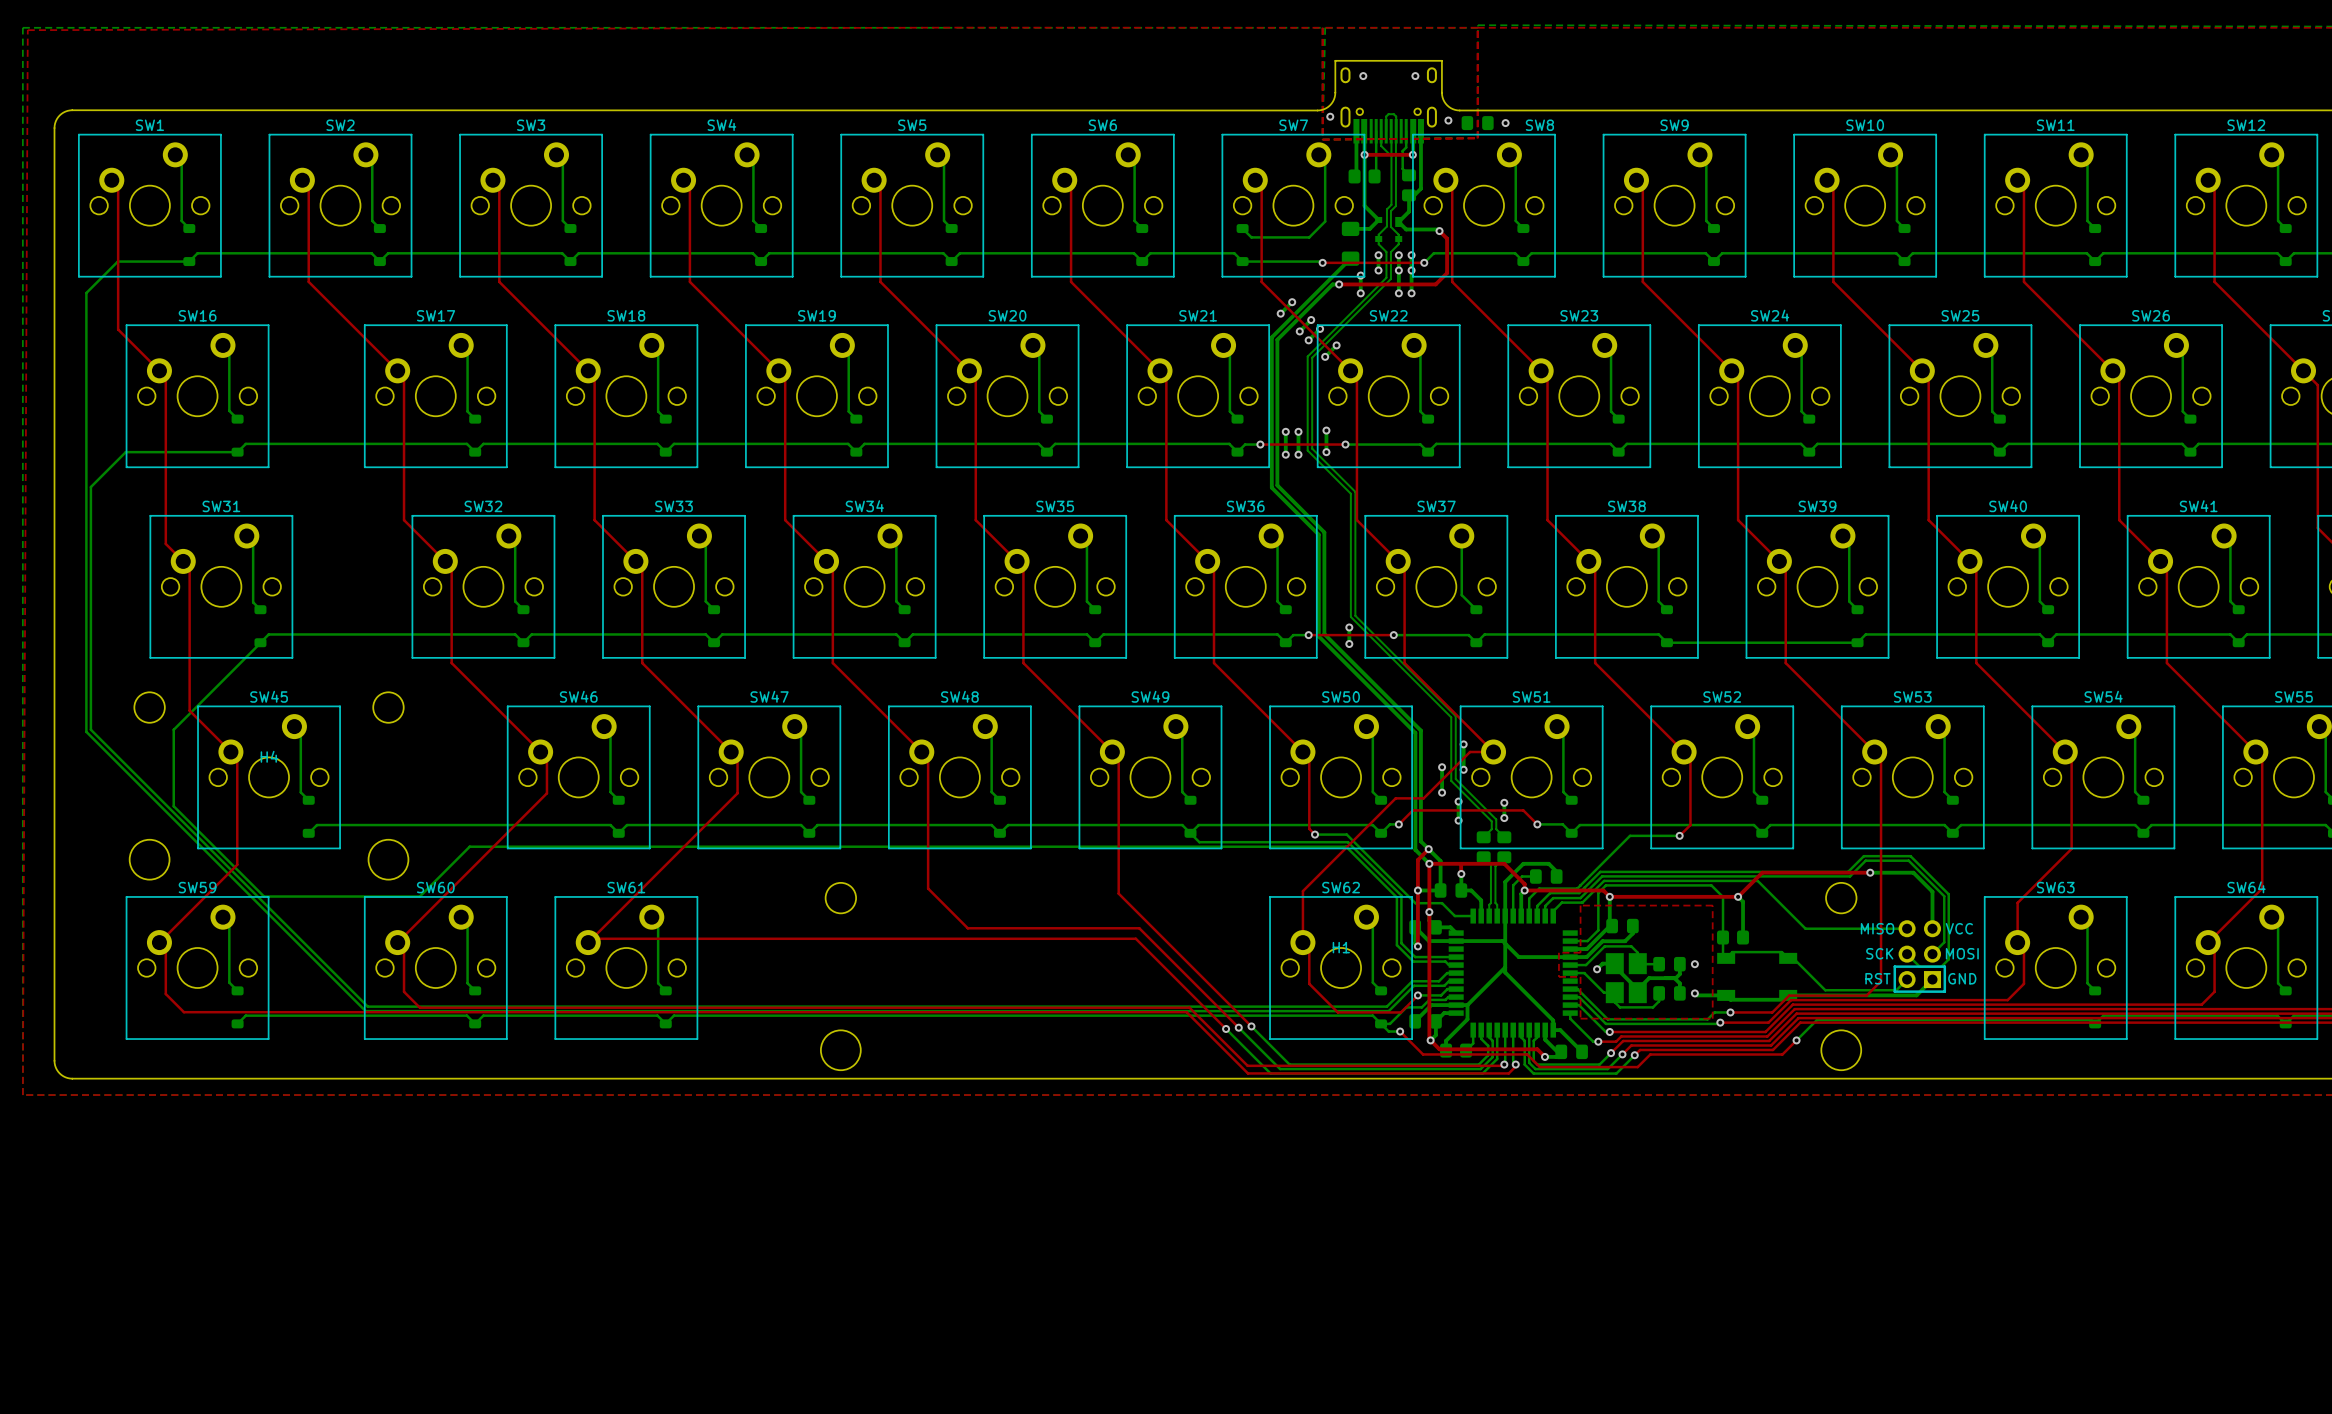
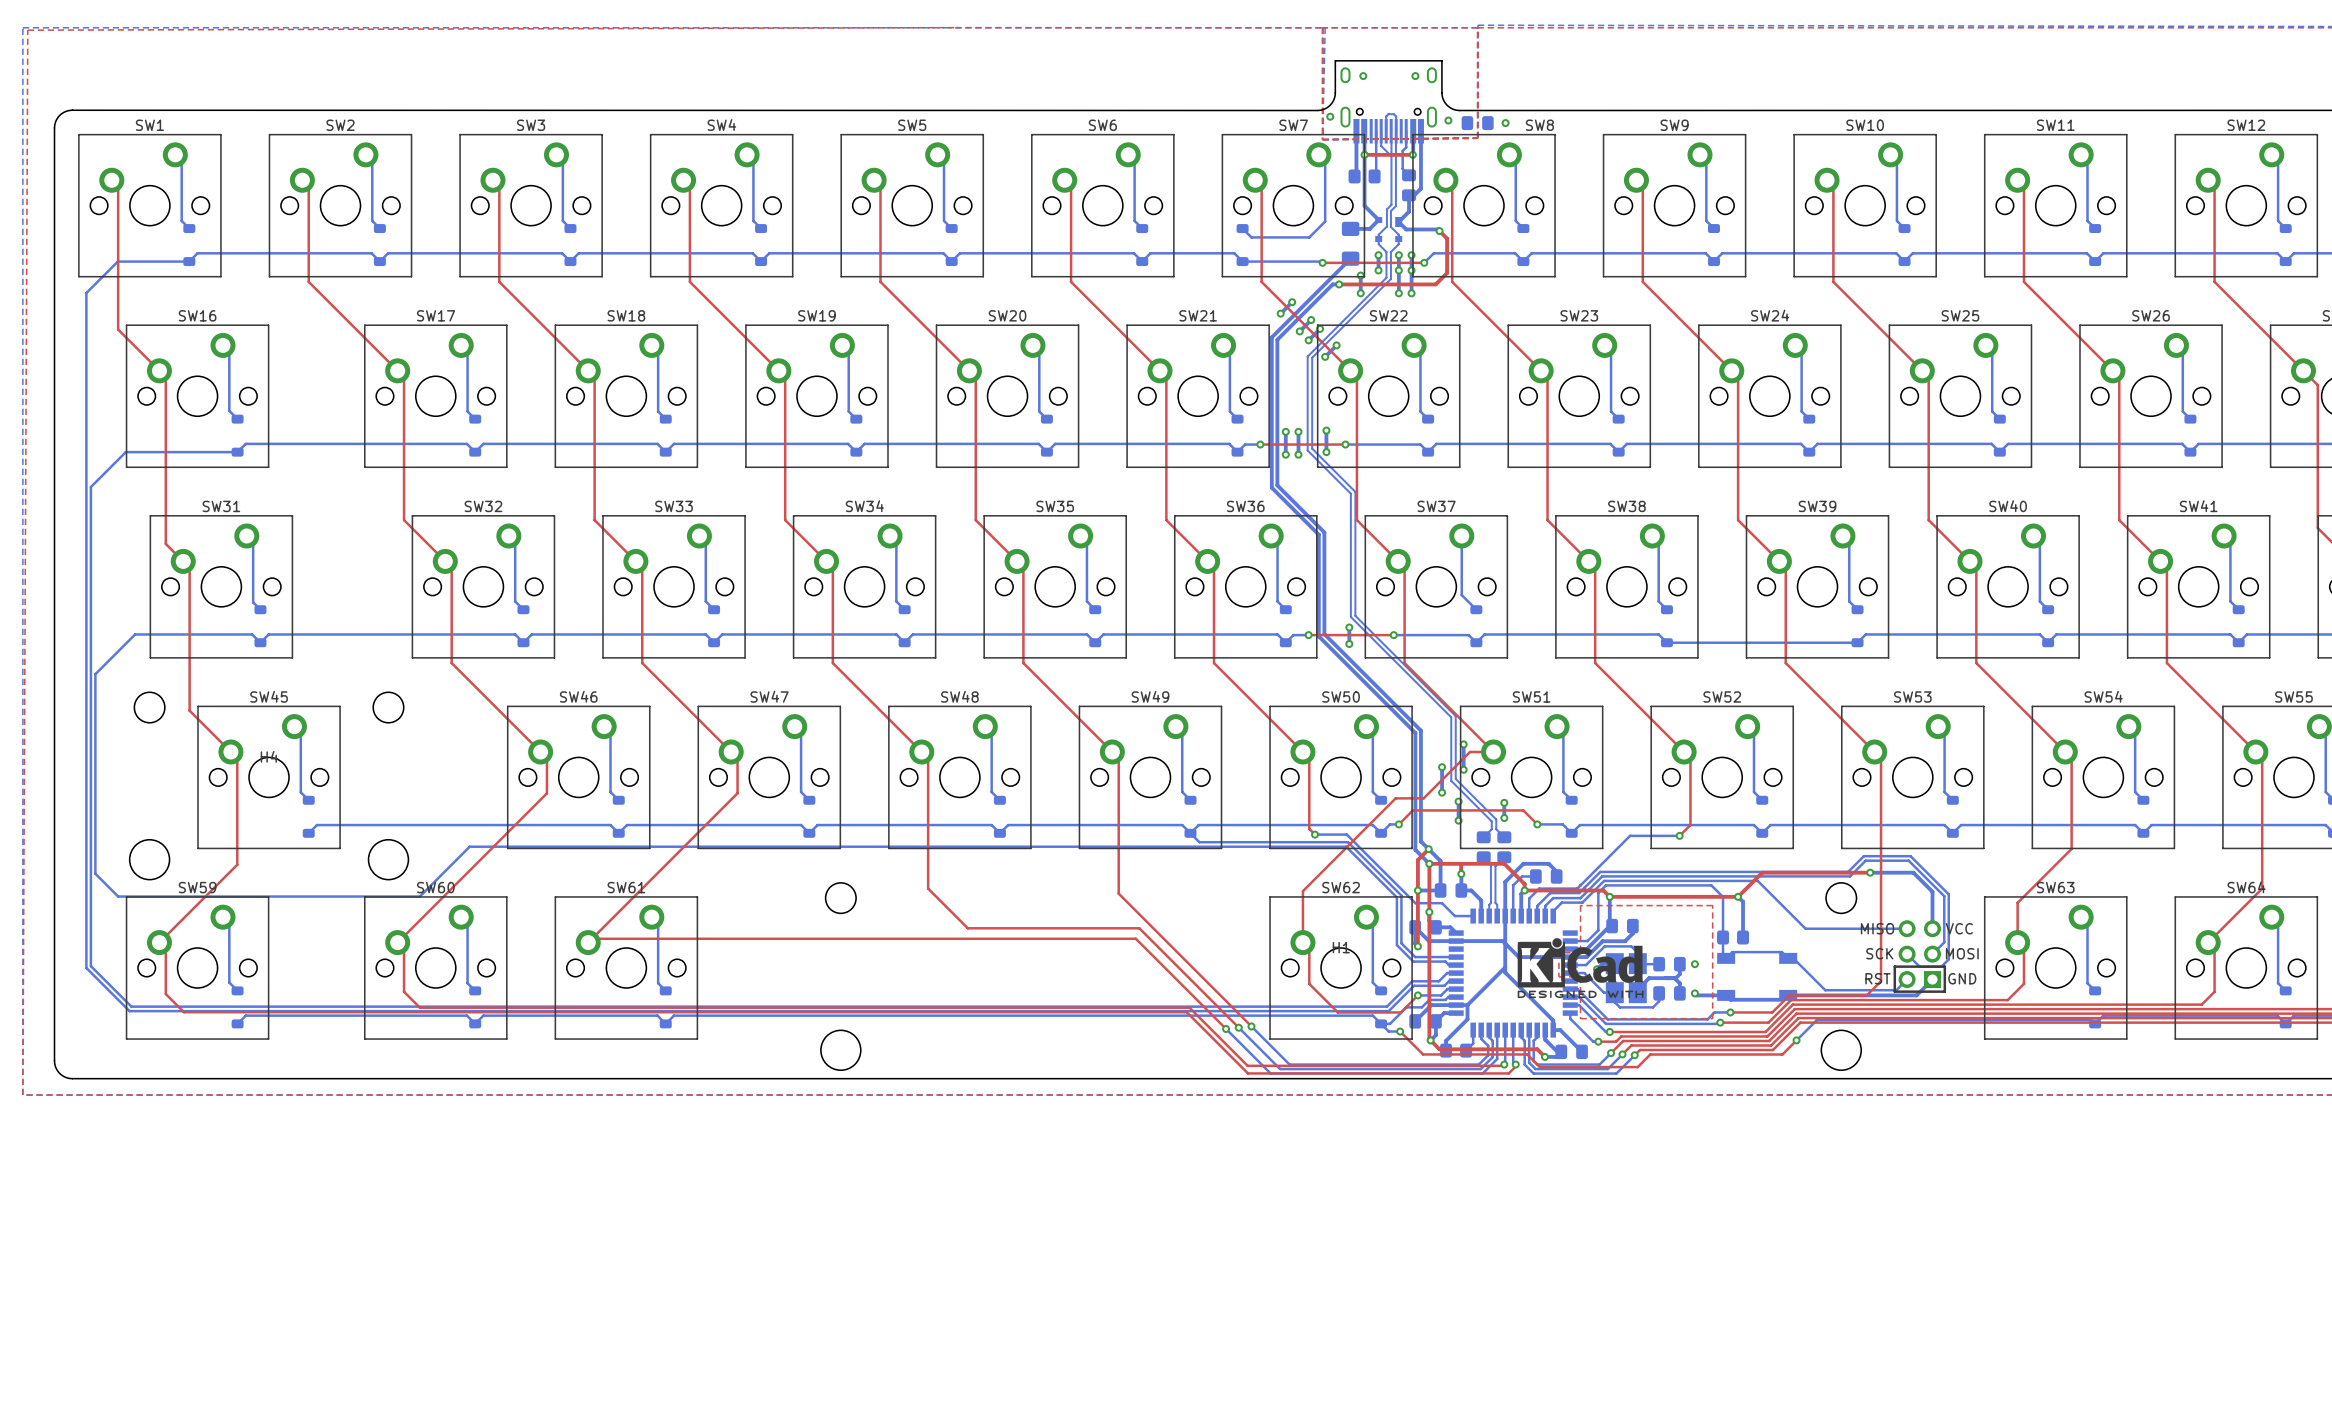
bottom track: (260, 643) (173, 729) (173, 806) (264, 896) -> (260, 642) (252, 634) (135, 634) (95, 674) (95, 873) (118, 896) (264, 896)
bottom track: (90, 729) (367, 1006) -> (90, 729) (90, 966) (131, 1006) (367, 1006)
bottom track: (86, 731) (365, 1011) -> (86, 731) (86, 967) (129, 1011) (365, 1011)
drawing: none -> [1517, 938, 1644, 999]

